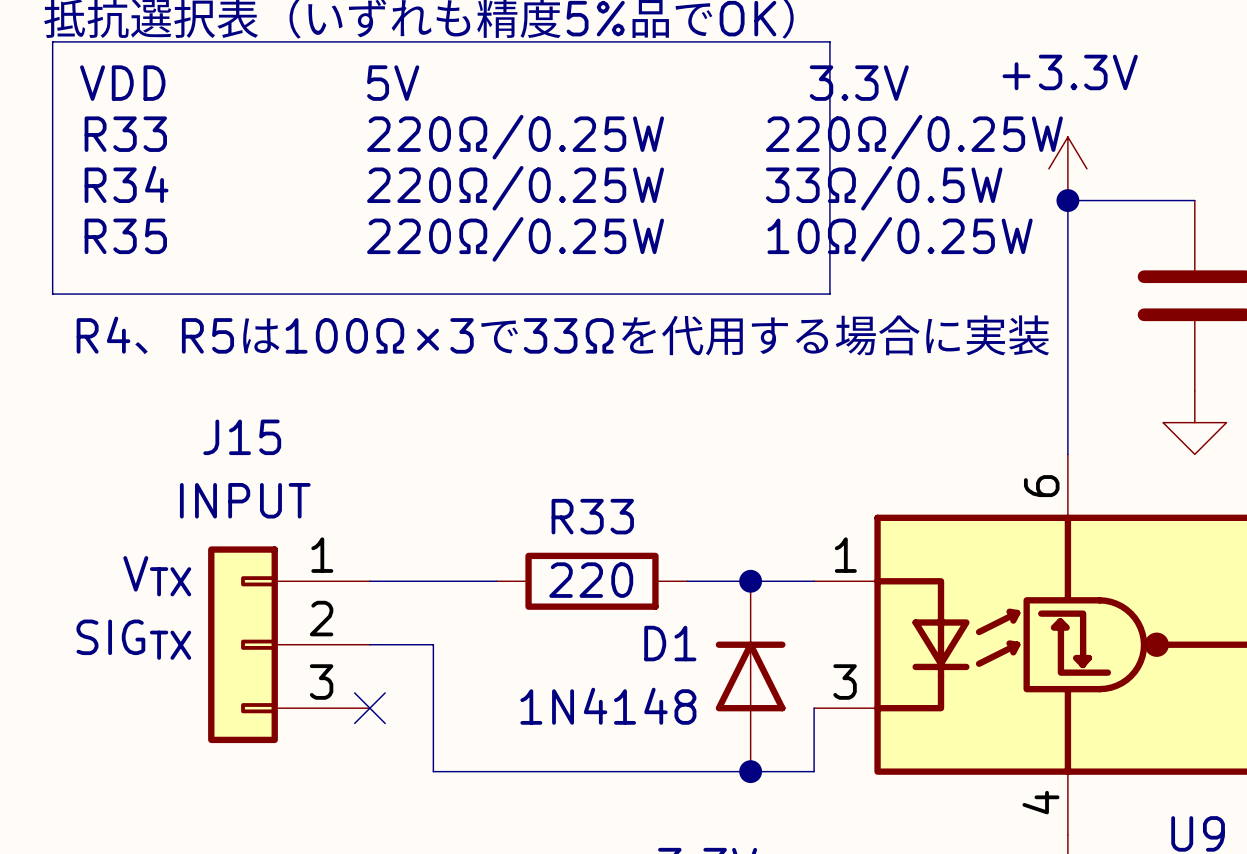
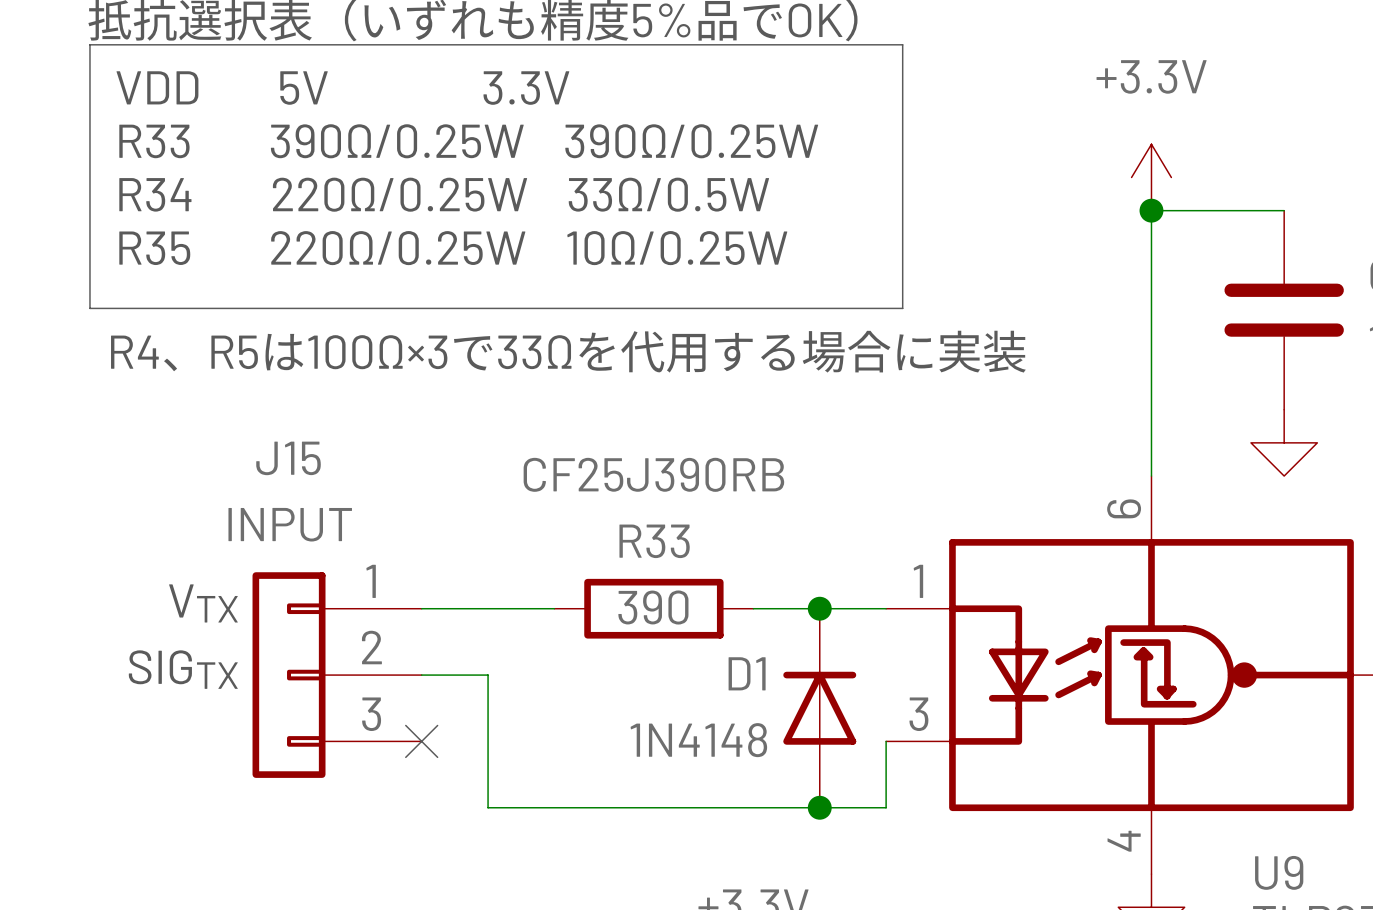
text: R33 220Ω/0.25W 220Ω/0.25W (573, 137) -> R33 390Ω/0.25W 390Ω/0.25W (468, 141)
R33 text: none -> CF25J390RB (653, 474)
R33 value: 220 (591, 580) -> 390 (653, 607)

